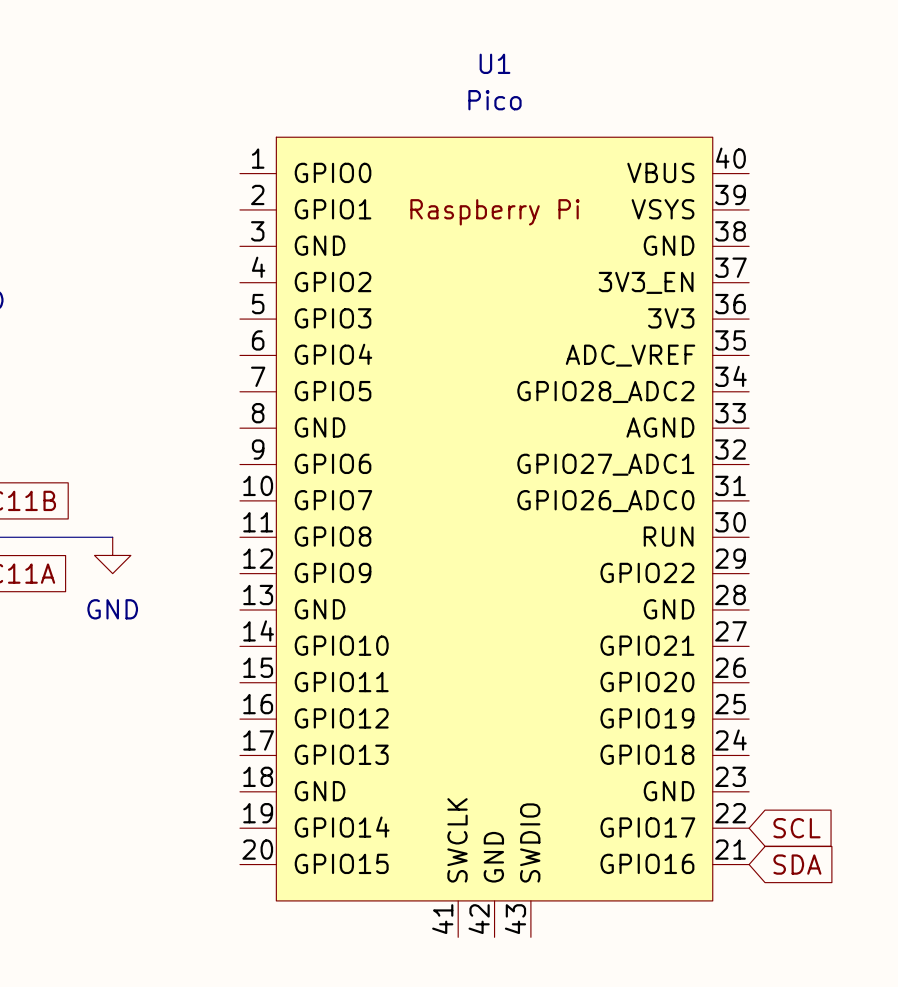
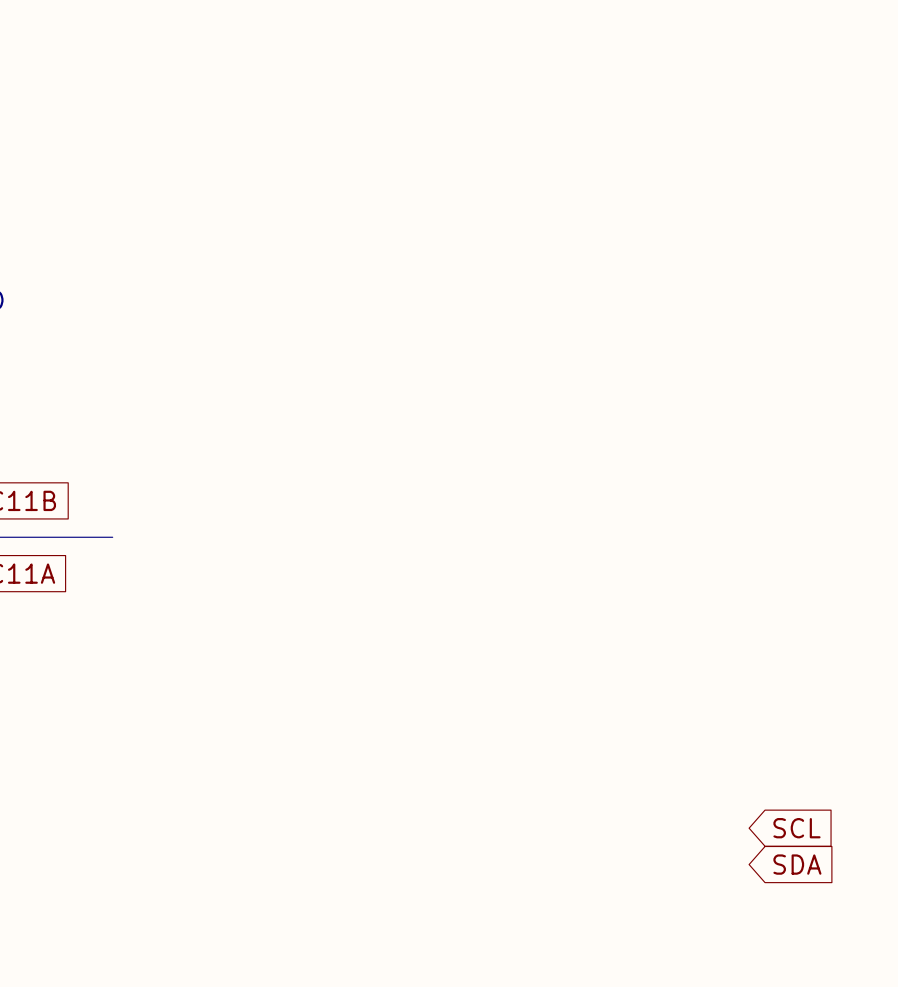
U1: Pico (494, 537) -> none
power symbol: GND (112, 555) -> none

